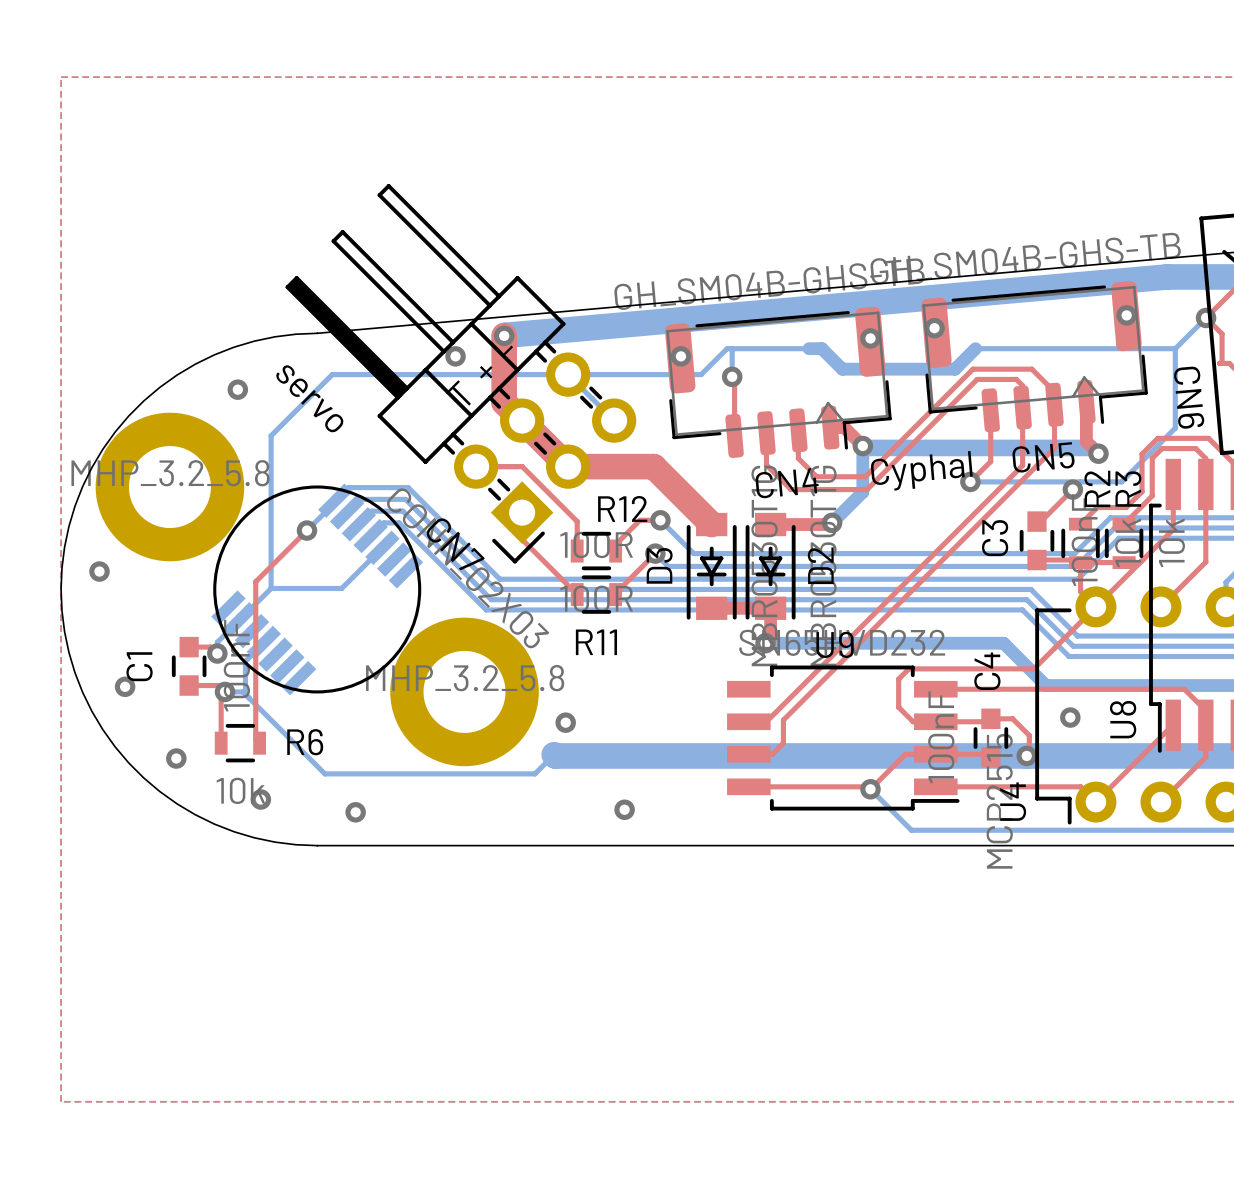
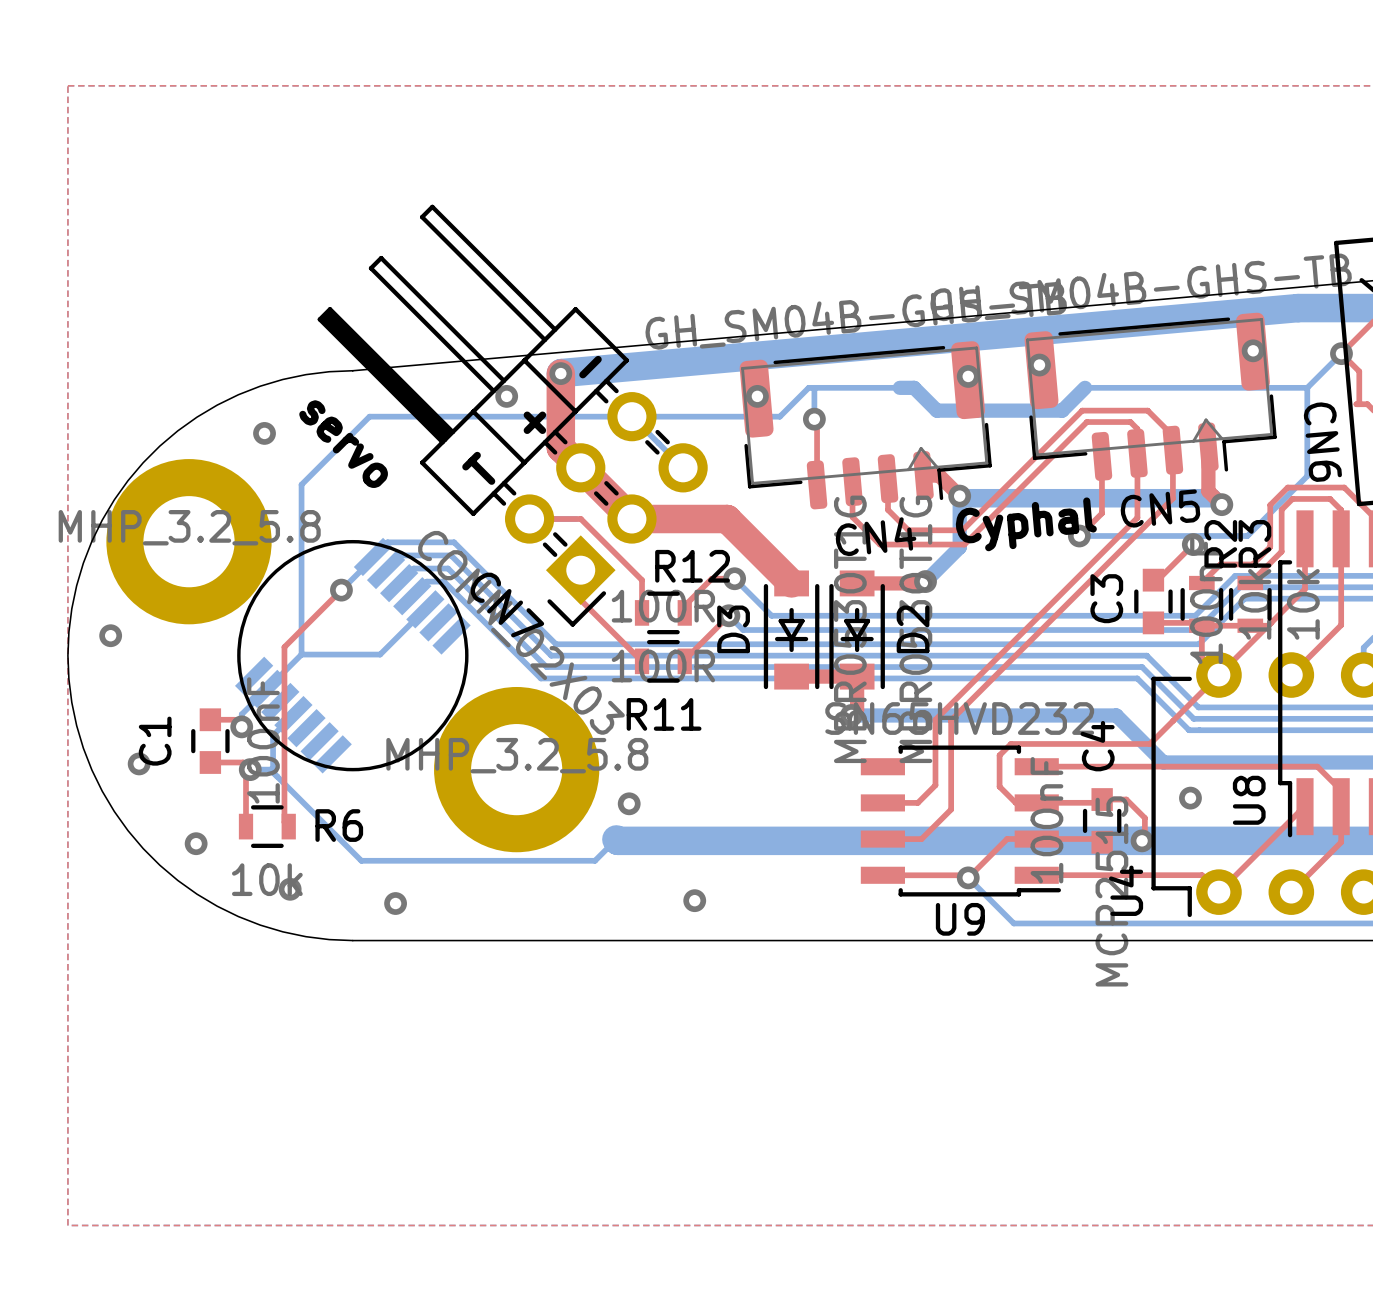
U9 name position: U9 (835, 644) -> U9 (960, 919)
top track: (841, 647) (766, 721) (748, 721) -> (935, 719) (935, 785) (917, 802) (882, 802)
top track: (855, 648) (783, 720) (783, 743) (772, 754) (748, 754) -> (951, 721) (951, 809) (921, 839) (882, 839)
U9 footprint: [727, 665, 960, 811] -> [860, 745, 1061, 897]
top track: (748, 786) (868, 786) -> (882, 875) (965, 875)

